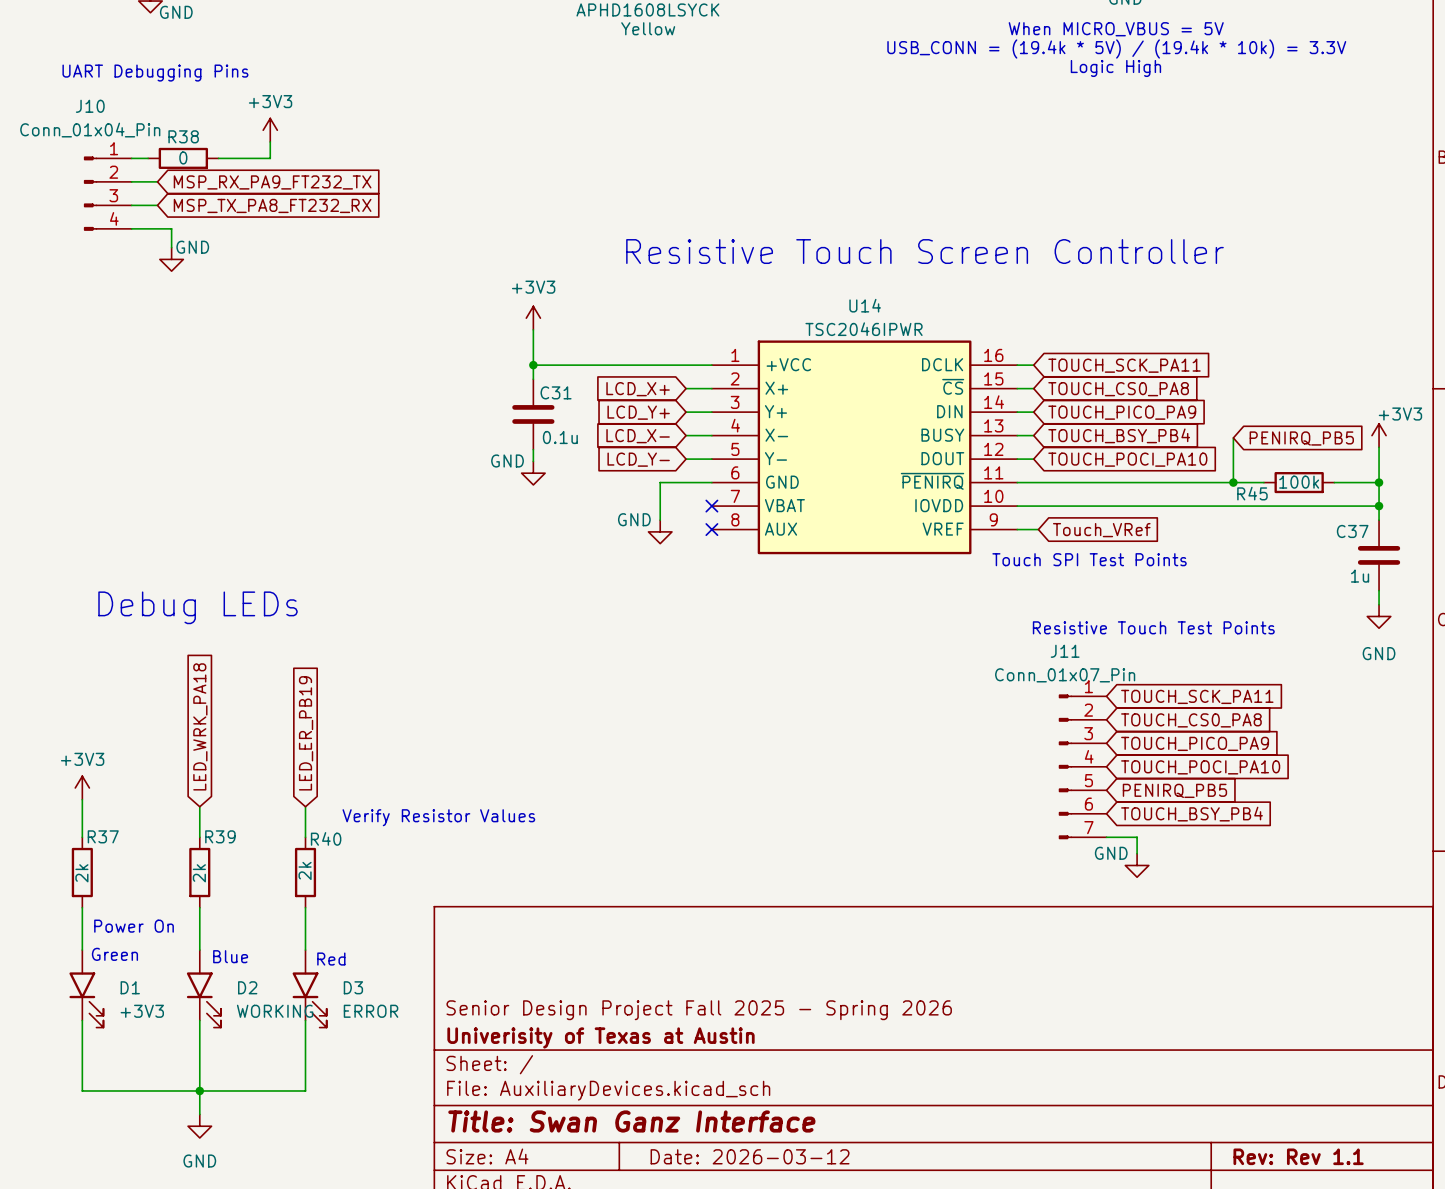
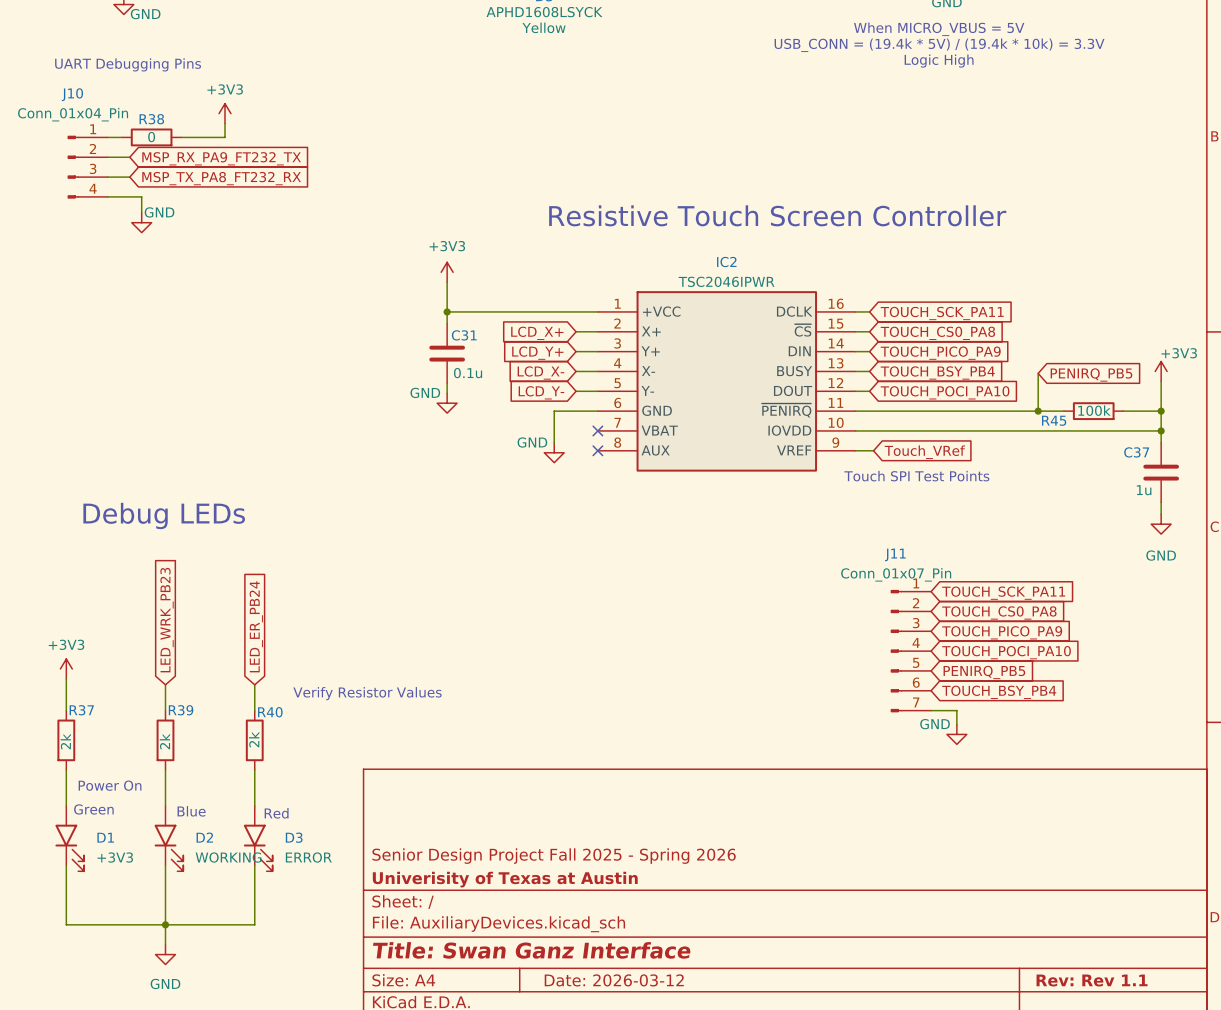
U14 name: U14 (865, 305) -> IC2 (726, 262)
text: Resistive Touch Test Points (1153, 627) -> none
global label: LED_WRK_PA18 (200, 726) -> LED_WRK_PB23 (167, 620)
global label: LED_ER_PB19 (306, 733) -> LED_ER_PB24 (256, 626)

